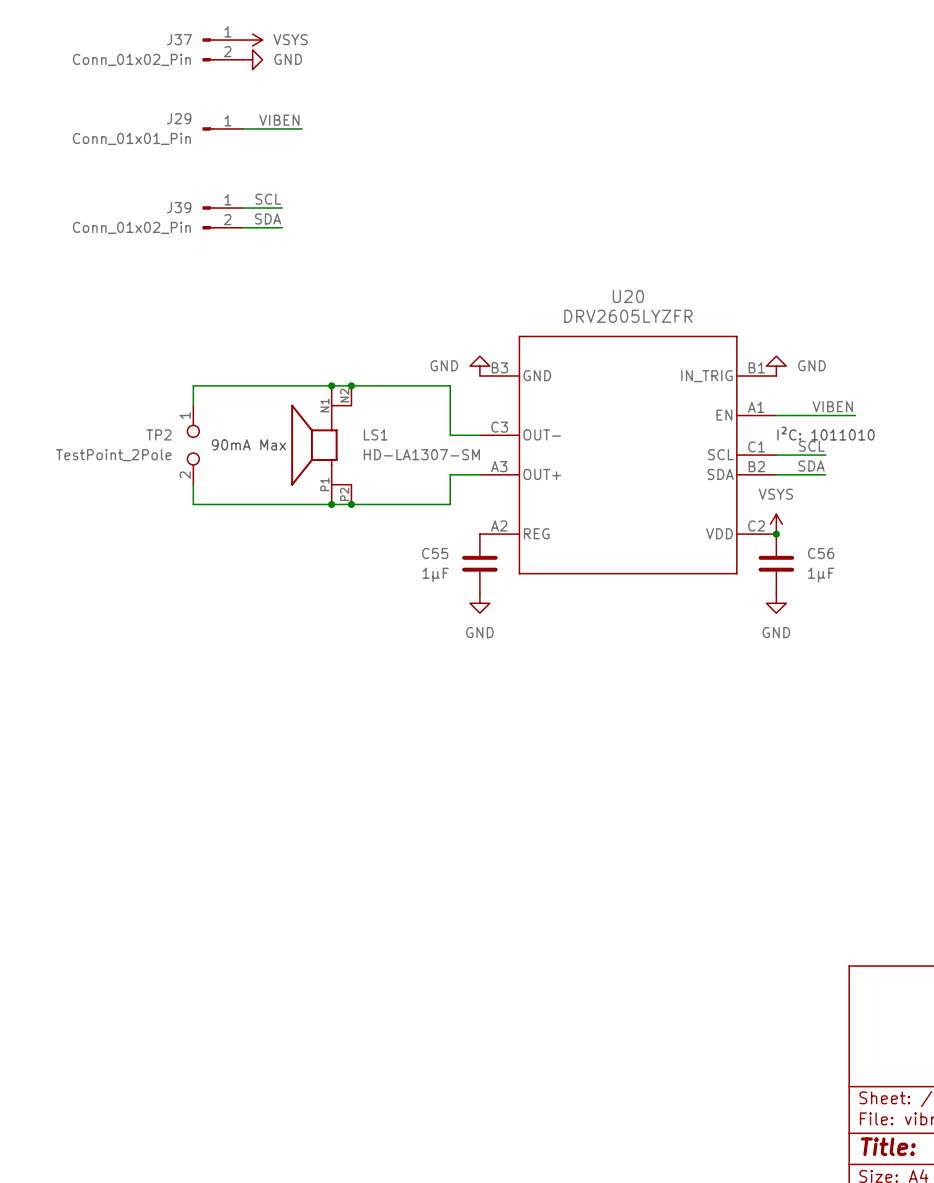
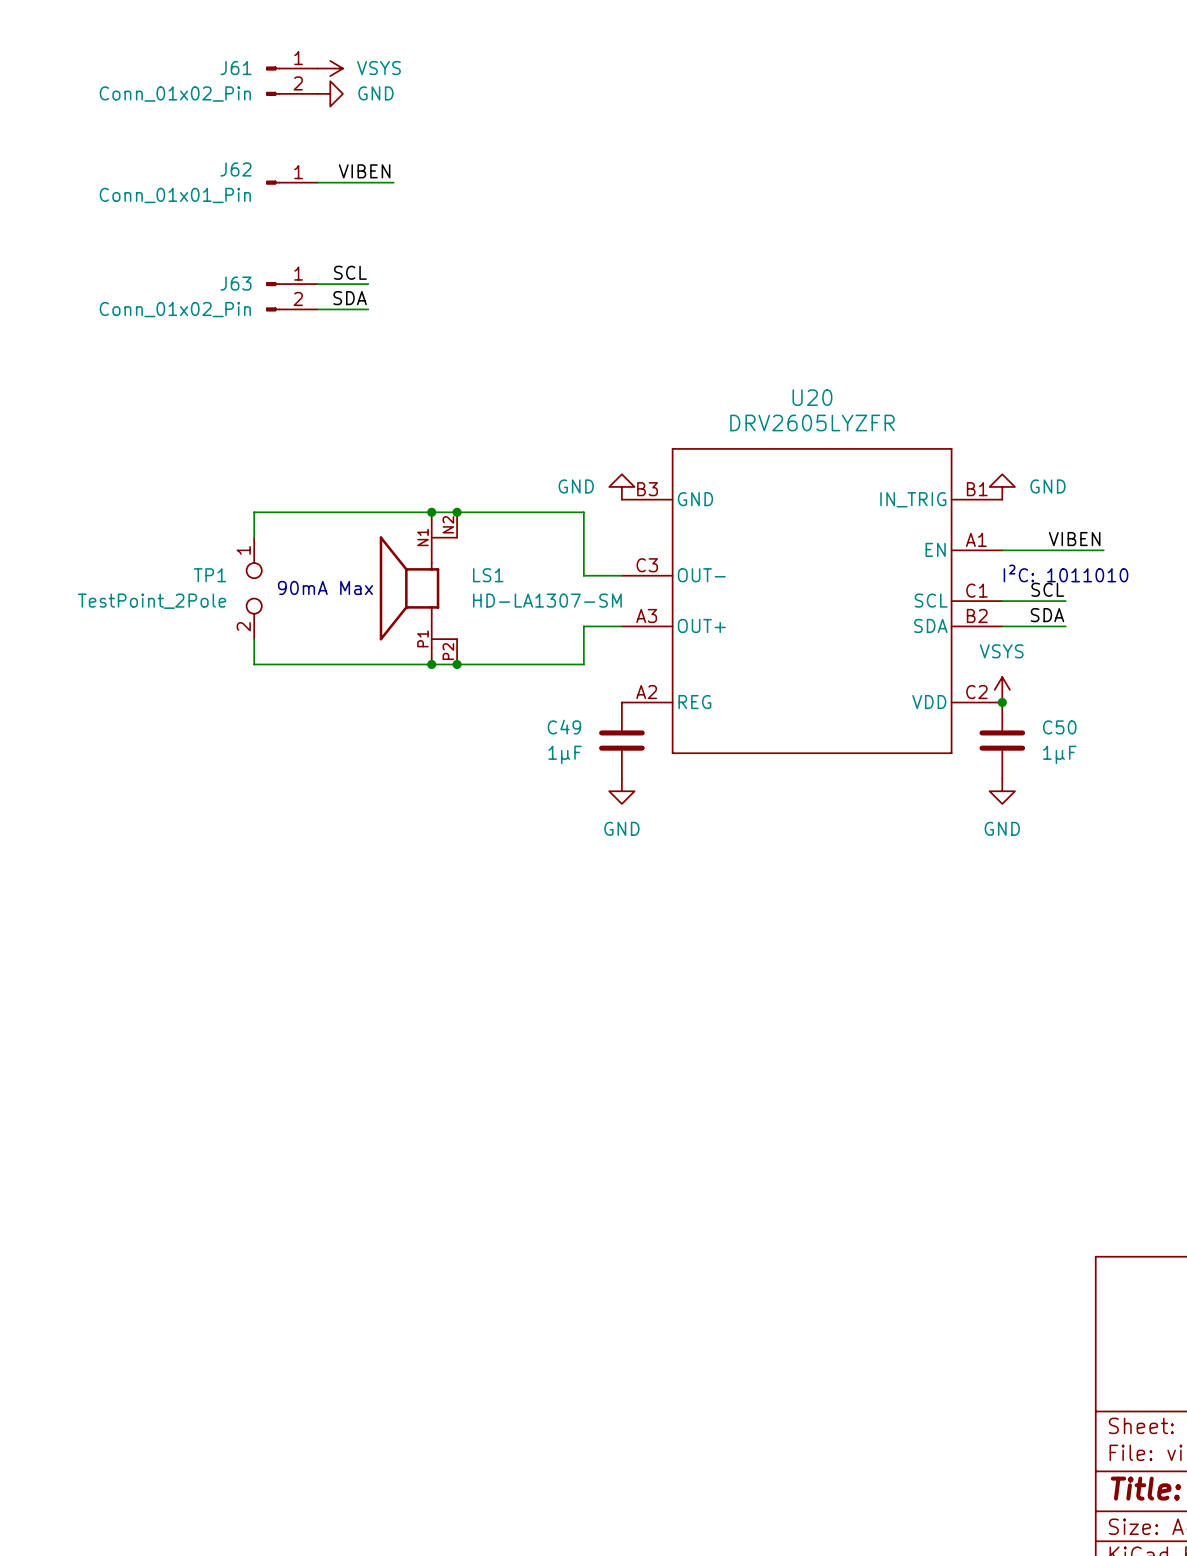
J37 name: J37 (179, 39) -> J61 (235, 68)
J29 name: J29 (179, 118) -> J62 (235, 169)
J39 name: J39 (179, 207) -> J63 (235, 283)
TP2 name: TP2 (158, 434) -> TP1 (210, 575)
C55 name: C55 (435, 553) -> C49 (564, 727)
C56 name: C56 (821, 553) -> C50 (1059, 727)

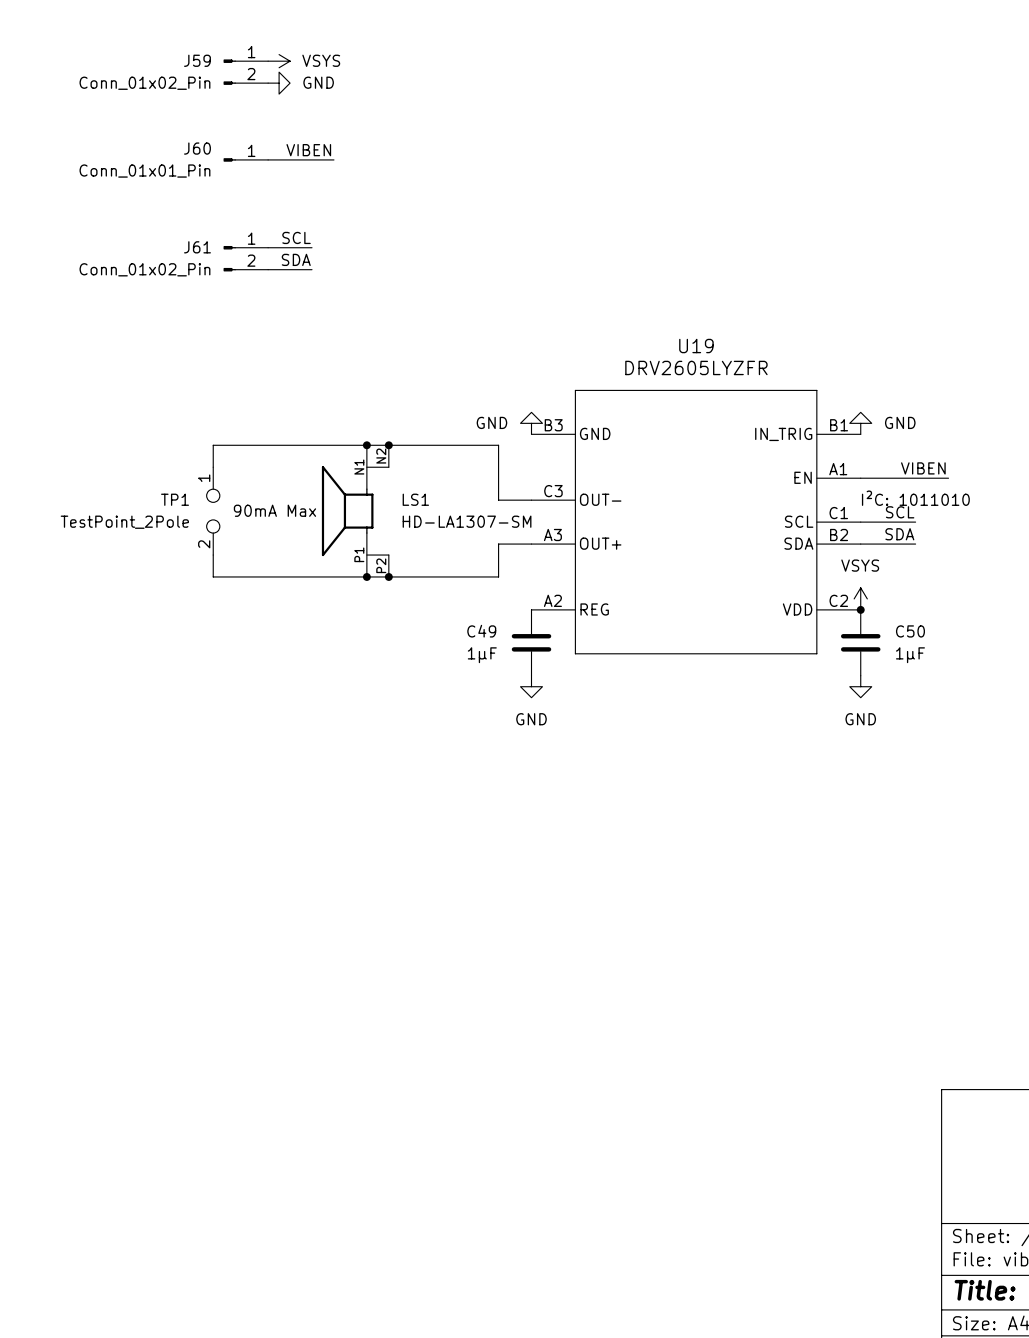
J61 name: J61 (235, 68) -> J59 (197, 60)
J62 name: J62 (235, 169) -> J60 (197, 148)
J63 name: J63 (235, 283) -> J61 (197, 247)
U20 name: U20 (812, 397) -> U19 (696, 346)

